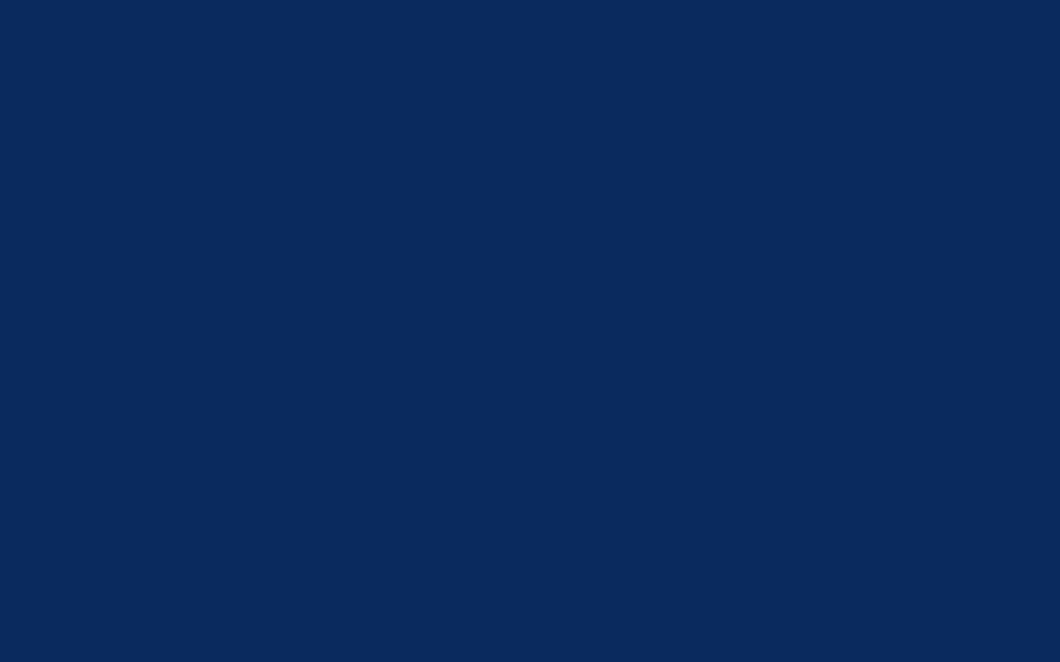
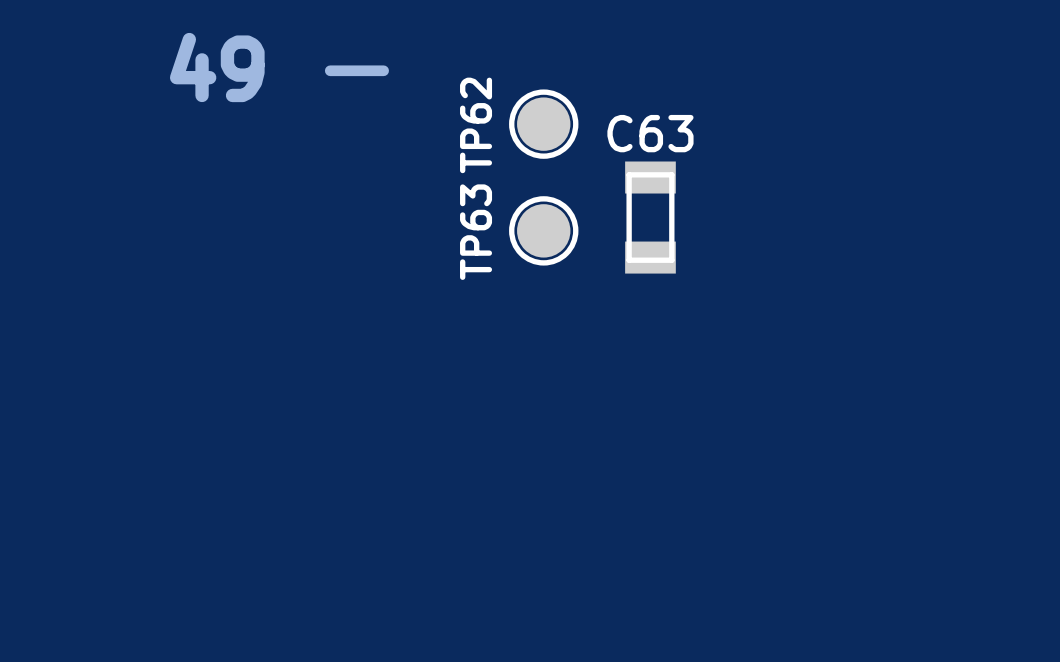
text: none -> 49 (217, 67)
line: none -> (330, 70) (383, 70)
TP62: none -> (543, 124)
C63: none -> (650, 217)
TP63: none -> (543, 230)

